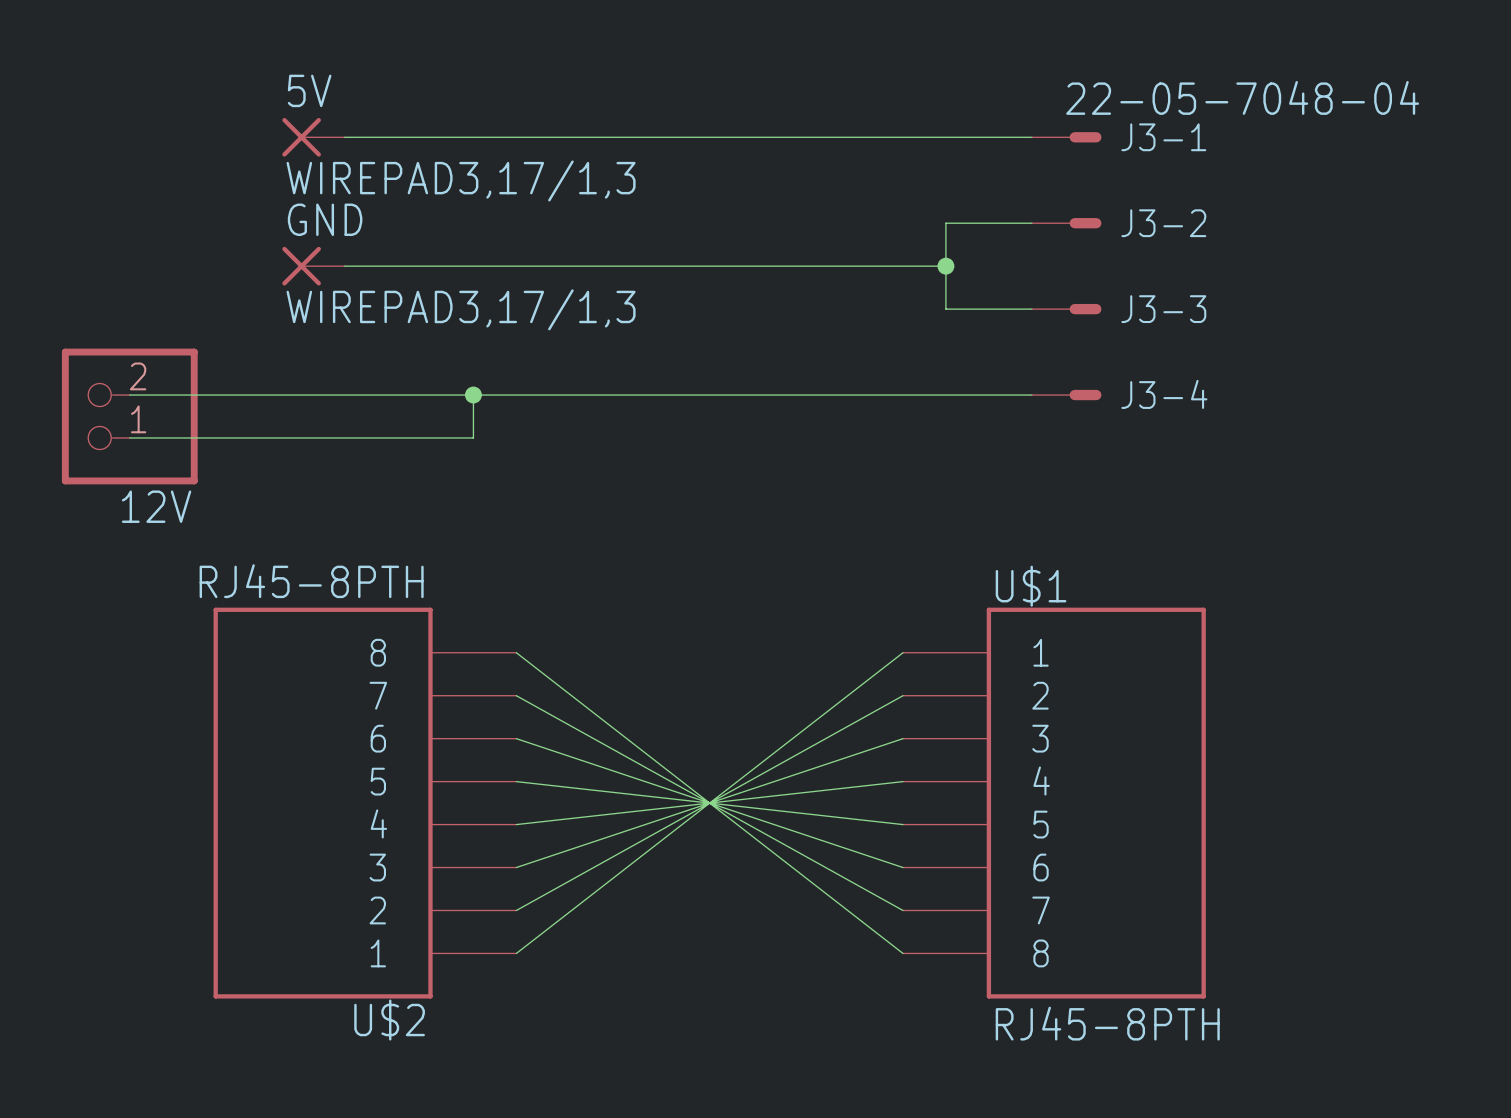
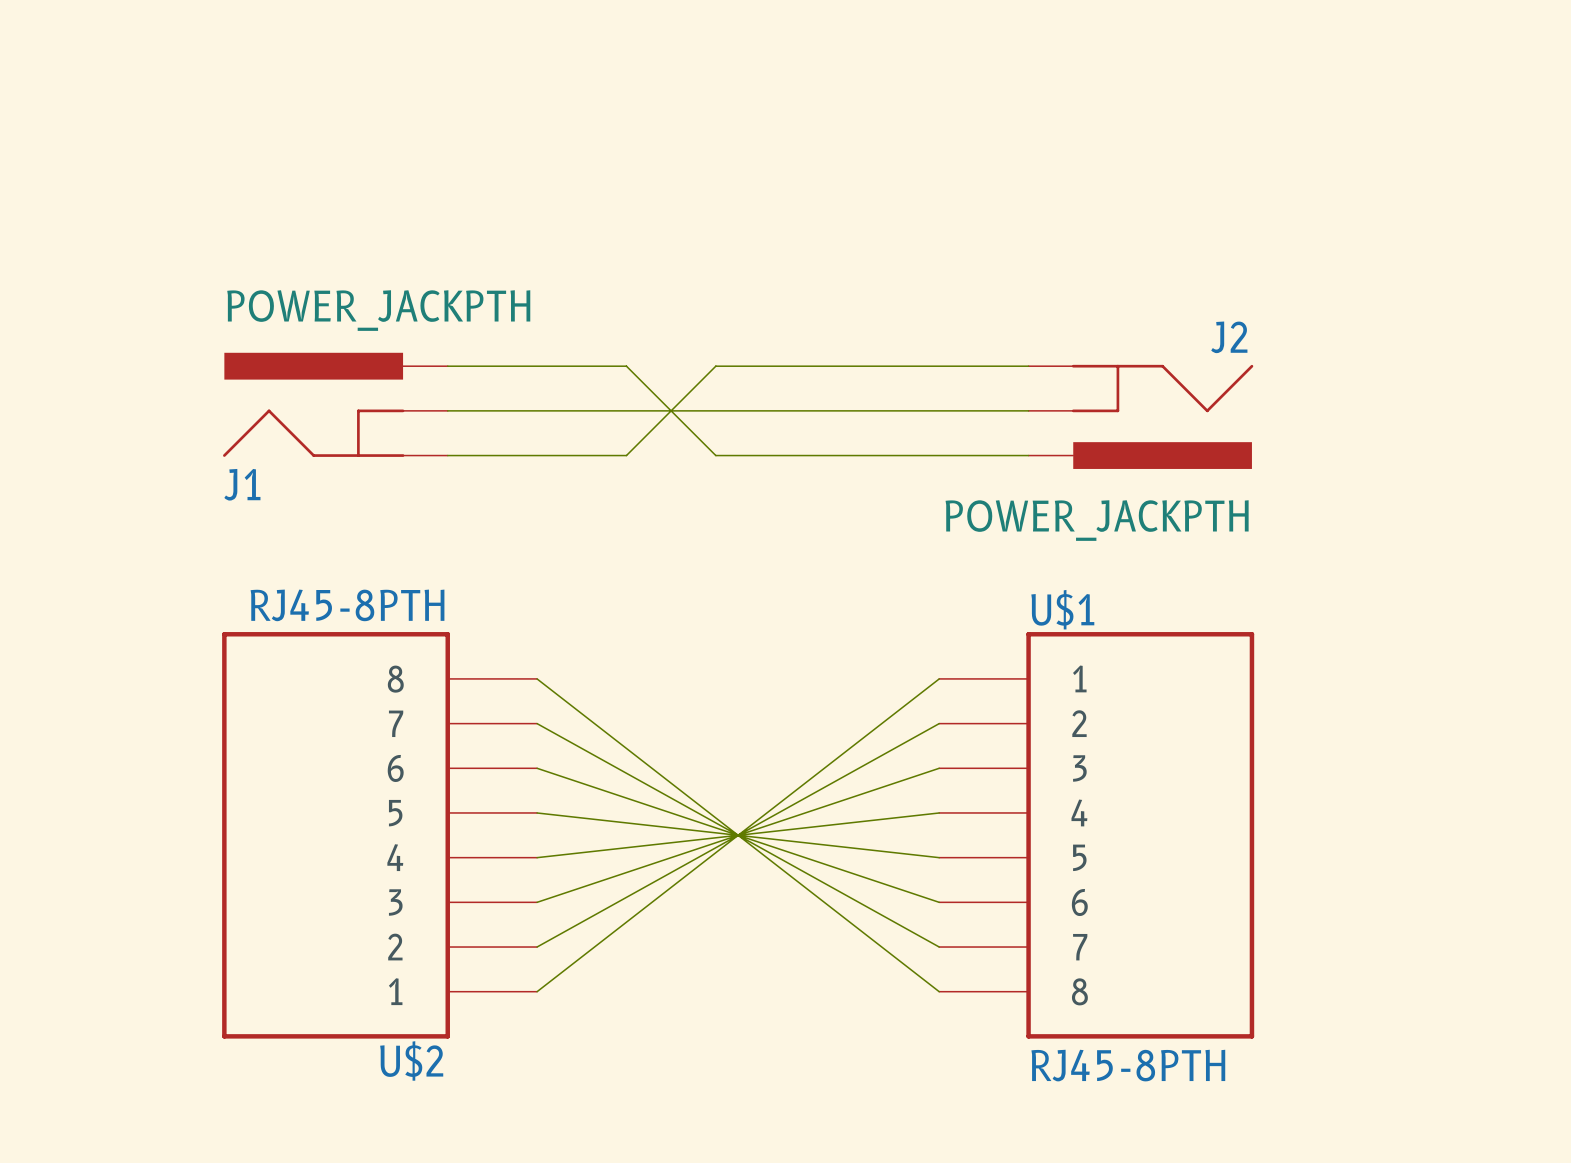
5V: WIREPAD3,17/1,3 (313, 137) -> none
wire: (344, 137) (1031, 137) -> none
J3-1: 22-05-7048-04 (1066, 137) -> none
wire: (1031, 223) (945, 223) (945, 309) (1031, 309) -> none
J3-2: (1066, 223) -> none
GND: WIREPAD3,17/1,3 (313, 266) -> none
wire: (344, 266) (945, 266) -> none
junction: (945, 266) -> none
J3-3: (1066, 309) -> none
wire: none -> (447, 366) (626, 366) (715, 455) (1028, 455)
J1: none -> POWER_JACKPTH (335, 404)
wire: (129, 395) (430, 395) -> none
wire: (473, 395) (473, 437) -> (1028, 366) (715, 366) (626, 455) (492, 455)
junction: (473, 395) -> none
J3-4: (1066, 395) -> none
J2: none -> POWER_JACKPTH (1140, 416)
12V: (129, 416) -> none
wire: (129, 437) (430, 437) -> none

